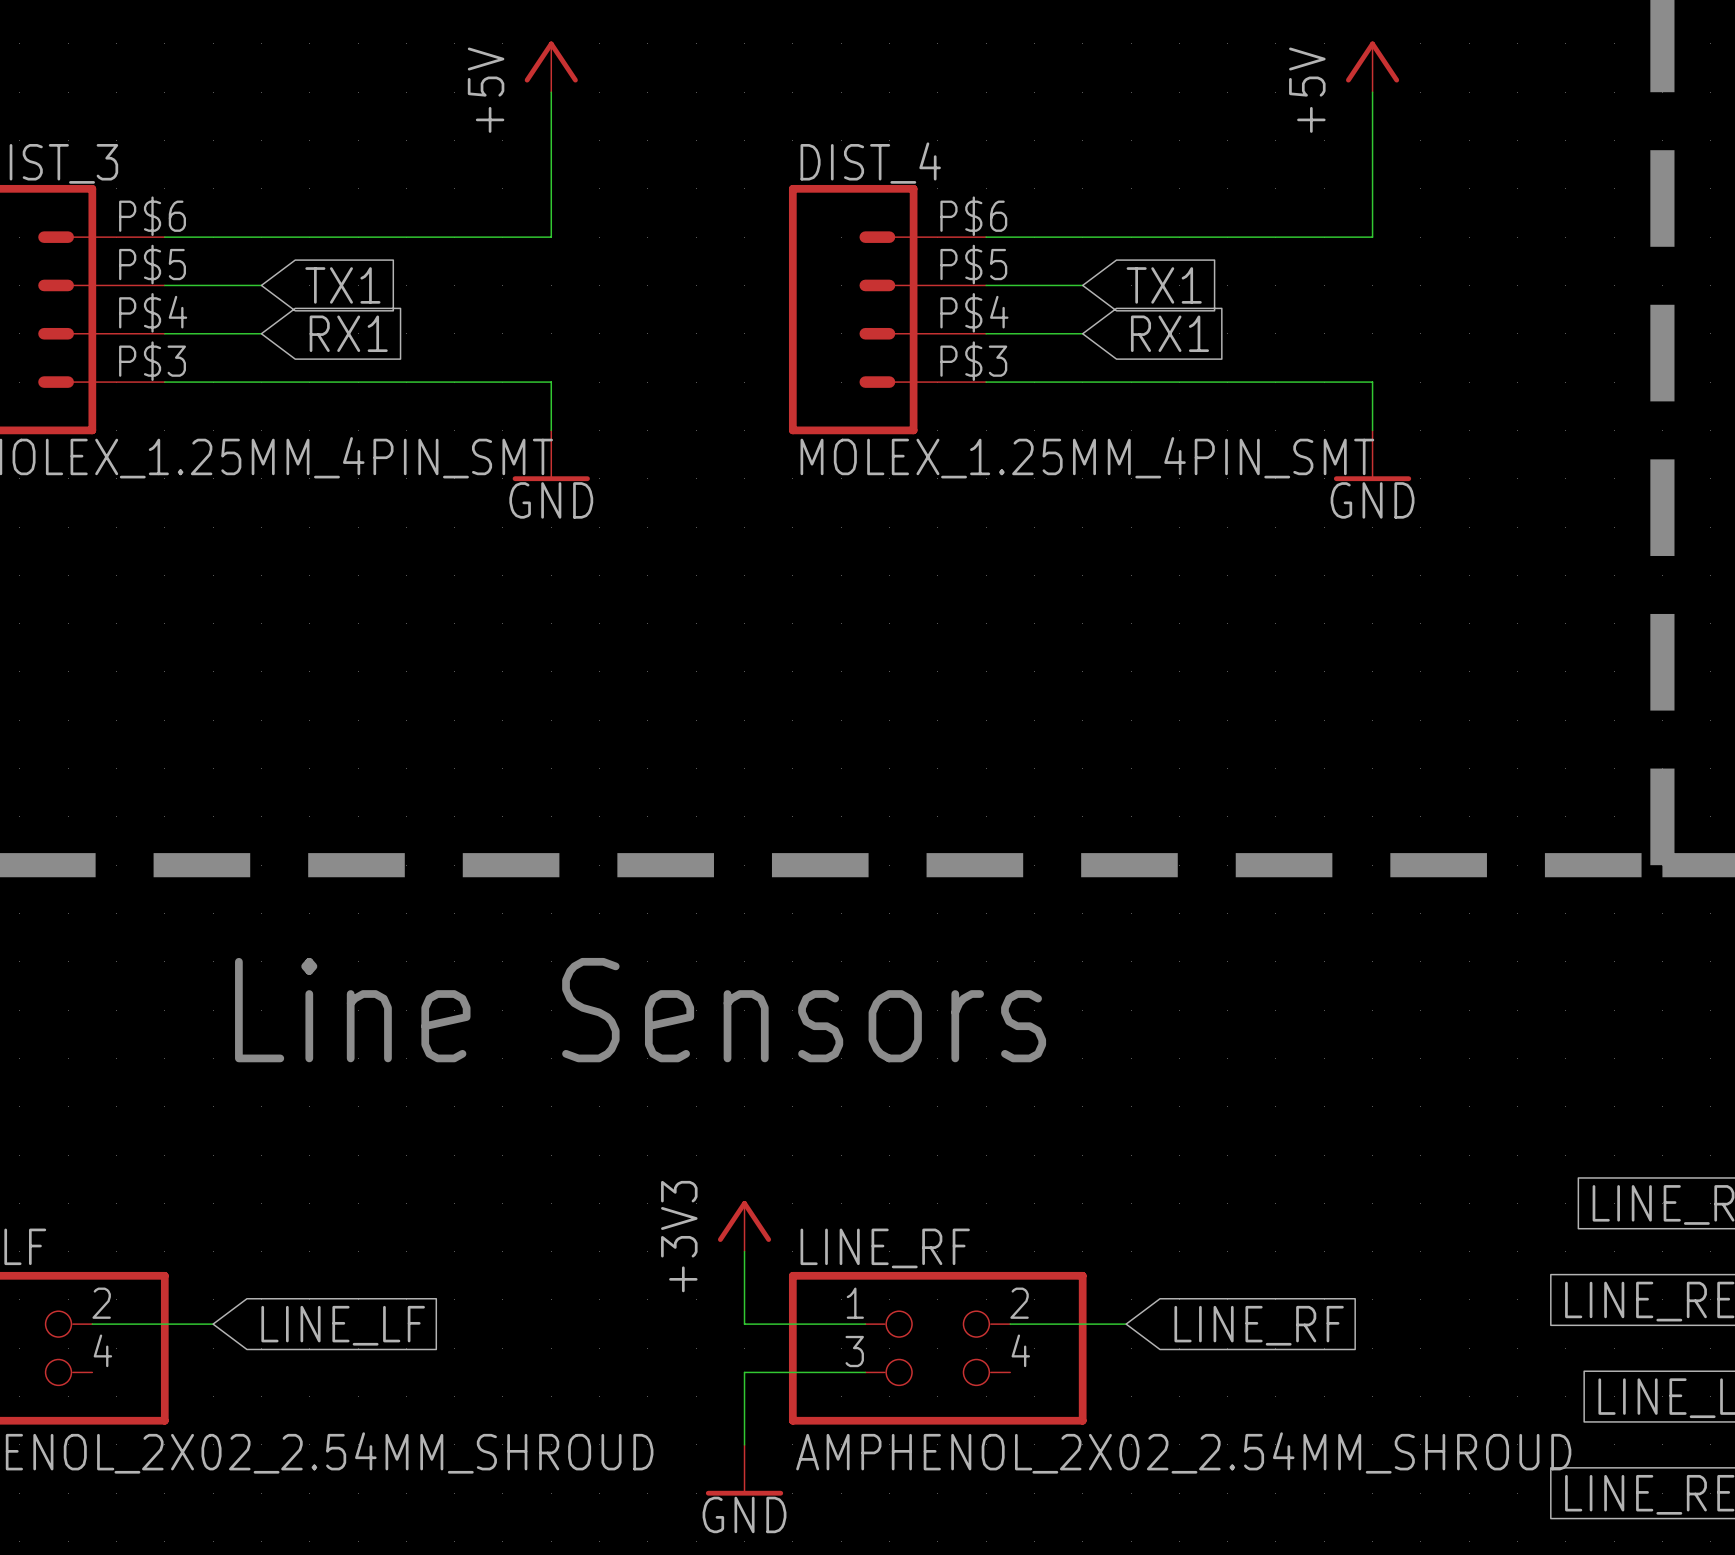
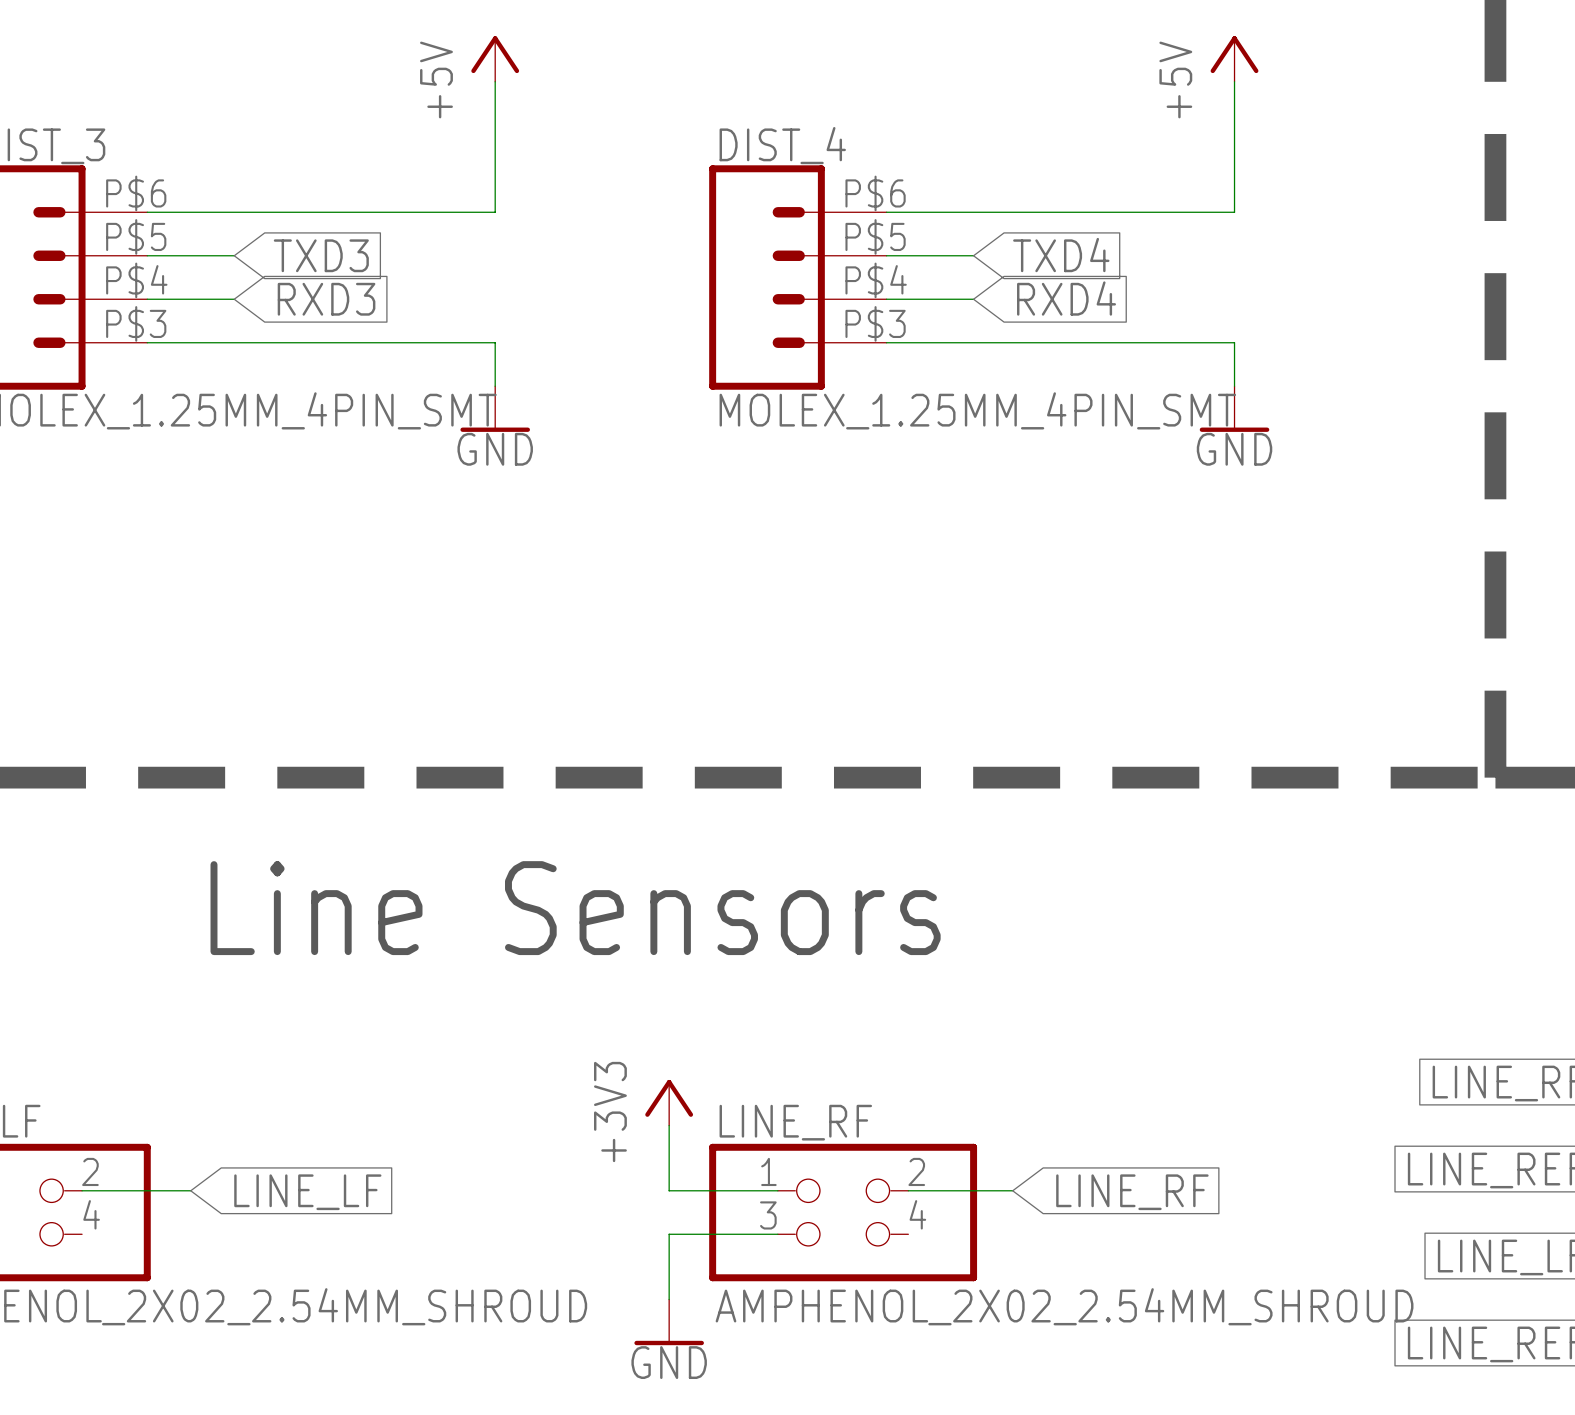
global label: TX1 (342, 285) -> TXD3 (321, 255)
global label: TX1 (1164, 285) -> TXD4 (1061, 255)
global label: RX1 (348, 333) -> RXD3 (326, 299)
global label: RX1 (1169, 333) -> RXD4 (1066, 298)

